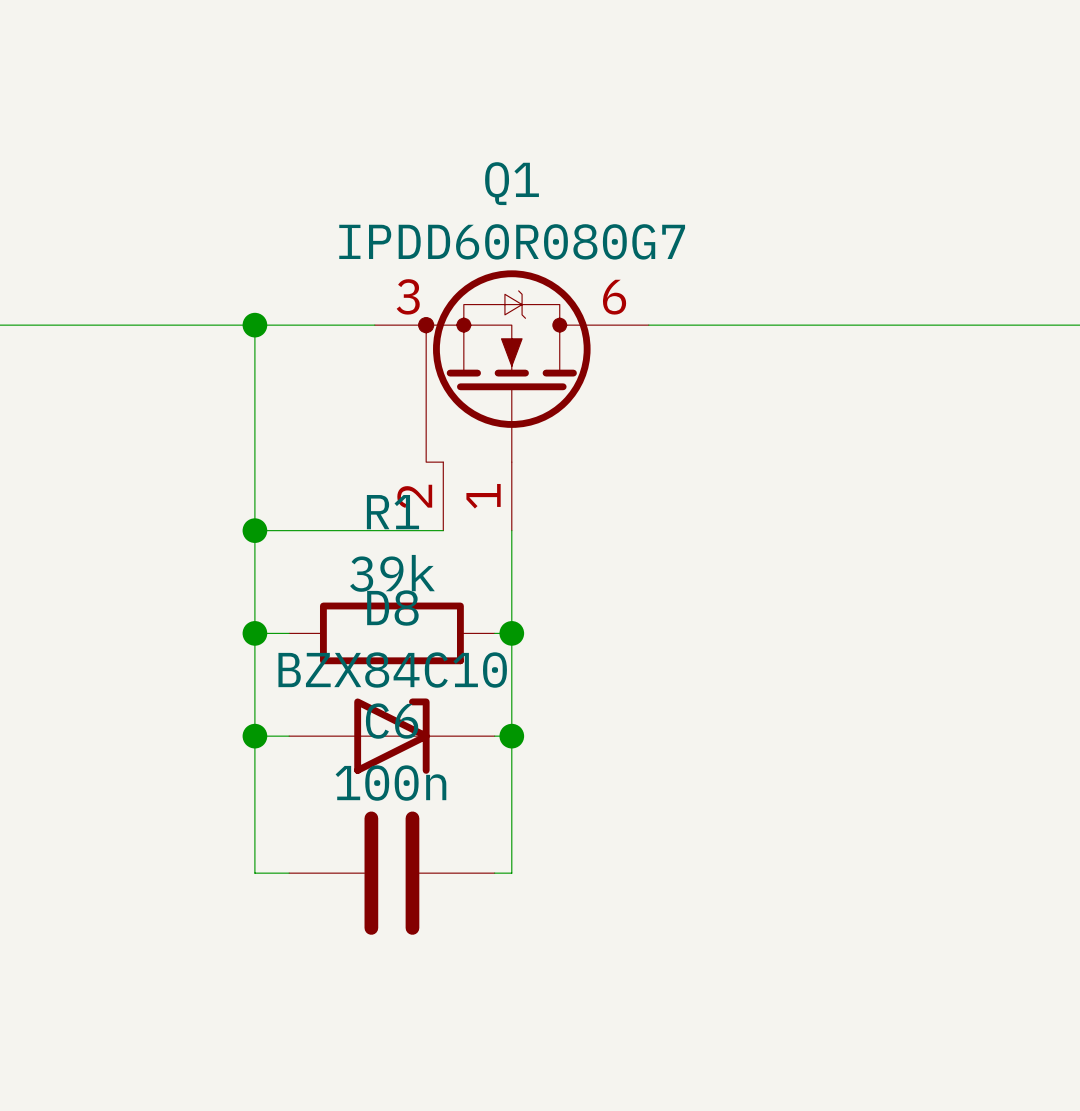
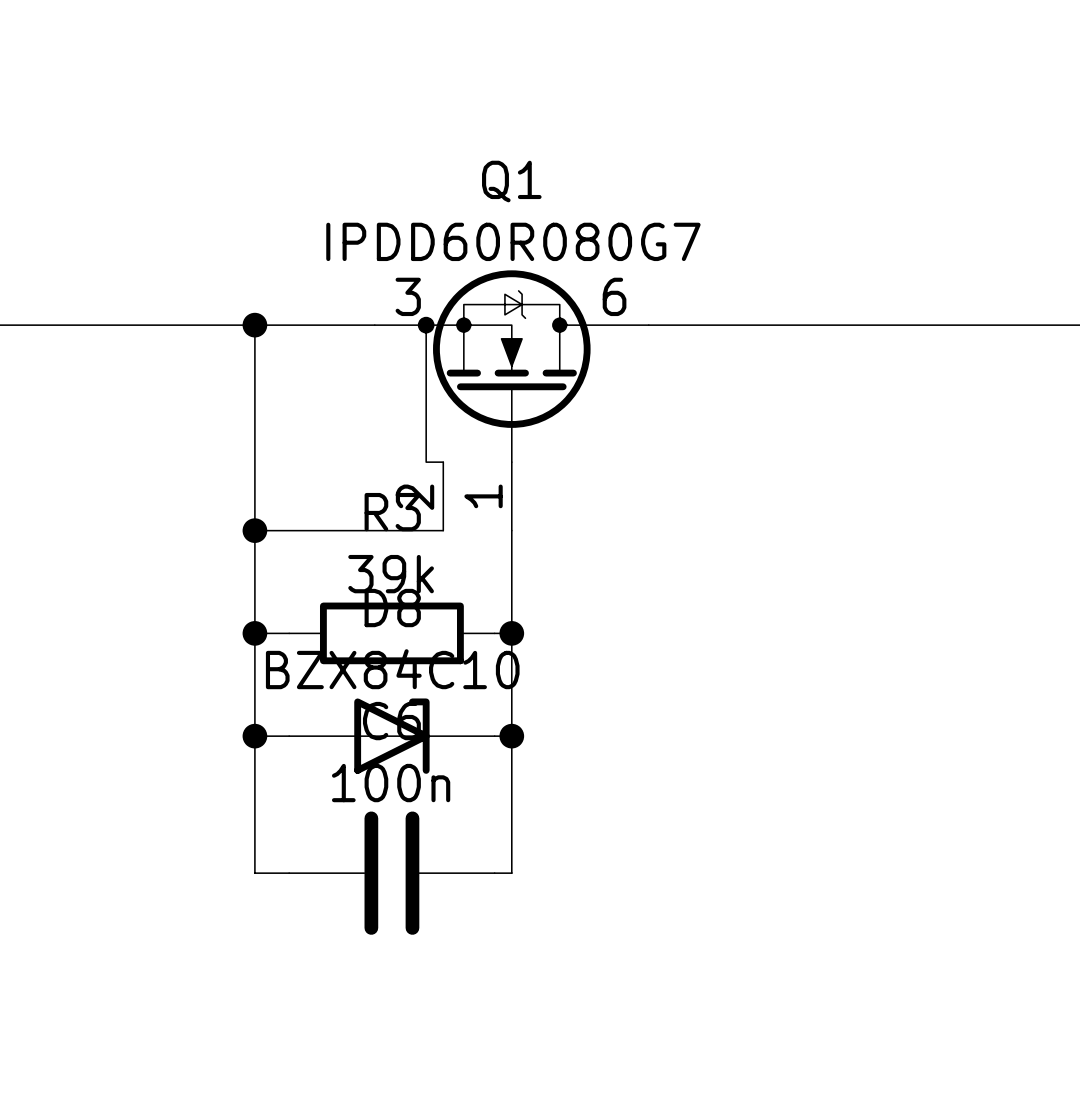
R1 name: R1 (392, 512) -> R3 (392, 512)

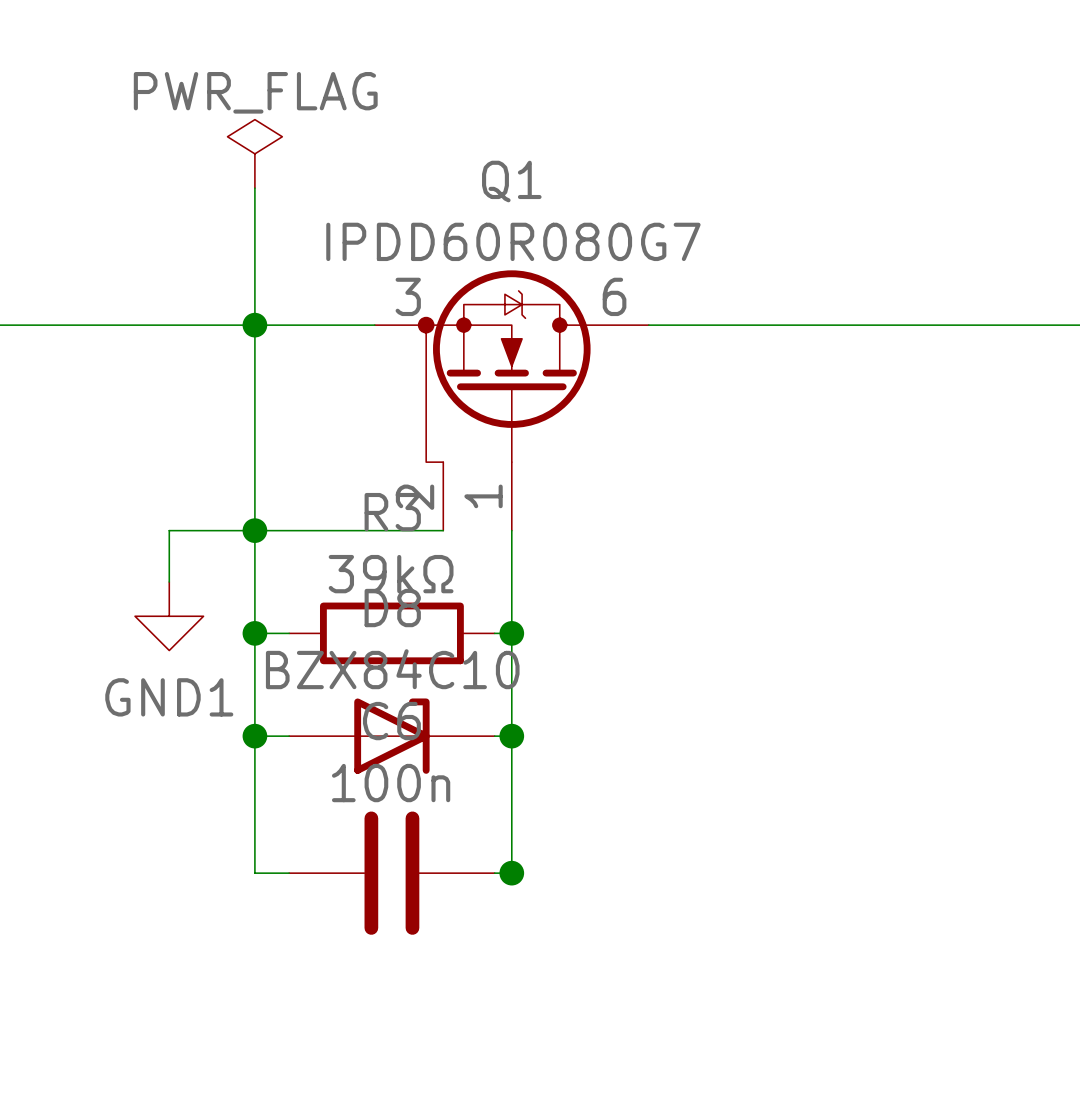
power symbol: none -> PWR_FLAG (254, 153)
wire: none -> (254, 188) (254, 325)
wire: none -> (254, 530) (169, 530) (169, 582)
R3 value: 39k (391, 574) -> 39kΩ (391, 574)
power symbol: none -> GND1 (169, 616)
junction: none -> (511, 873)

